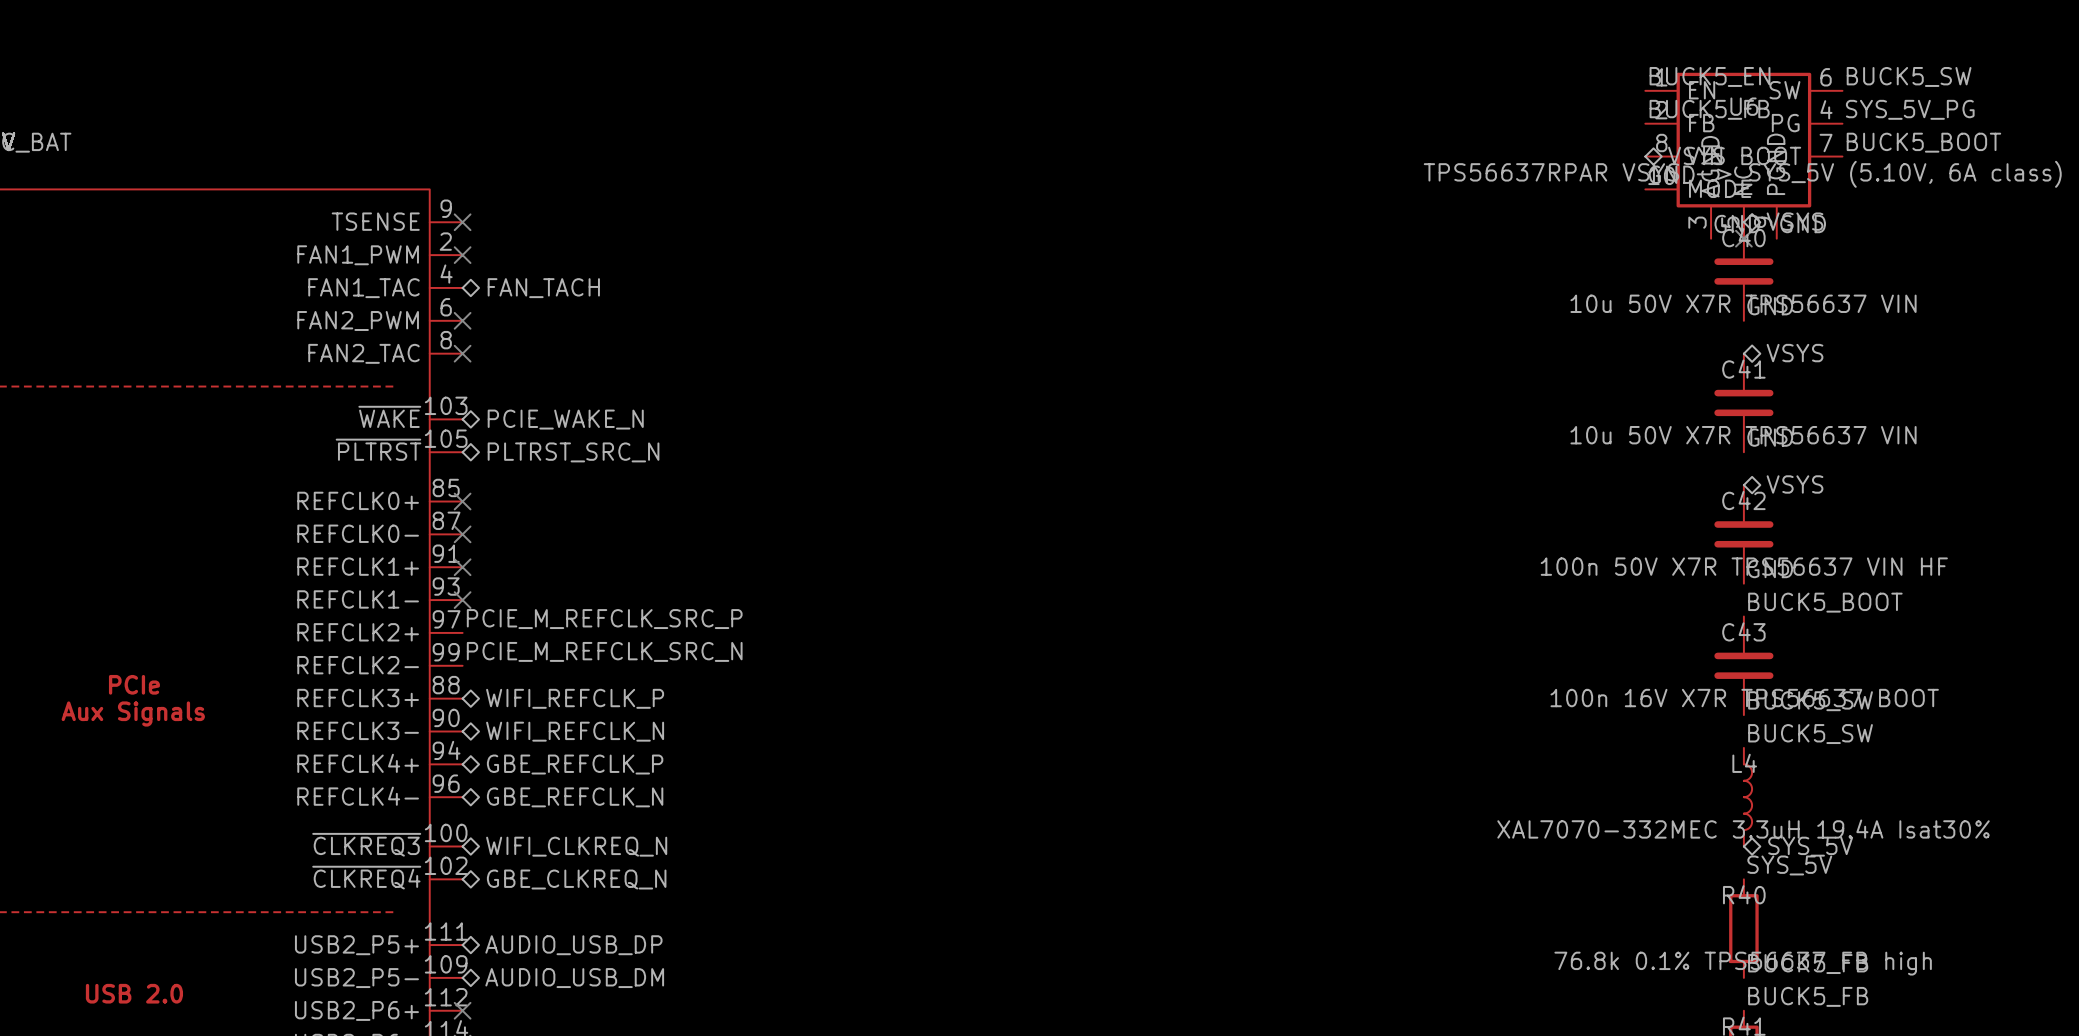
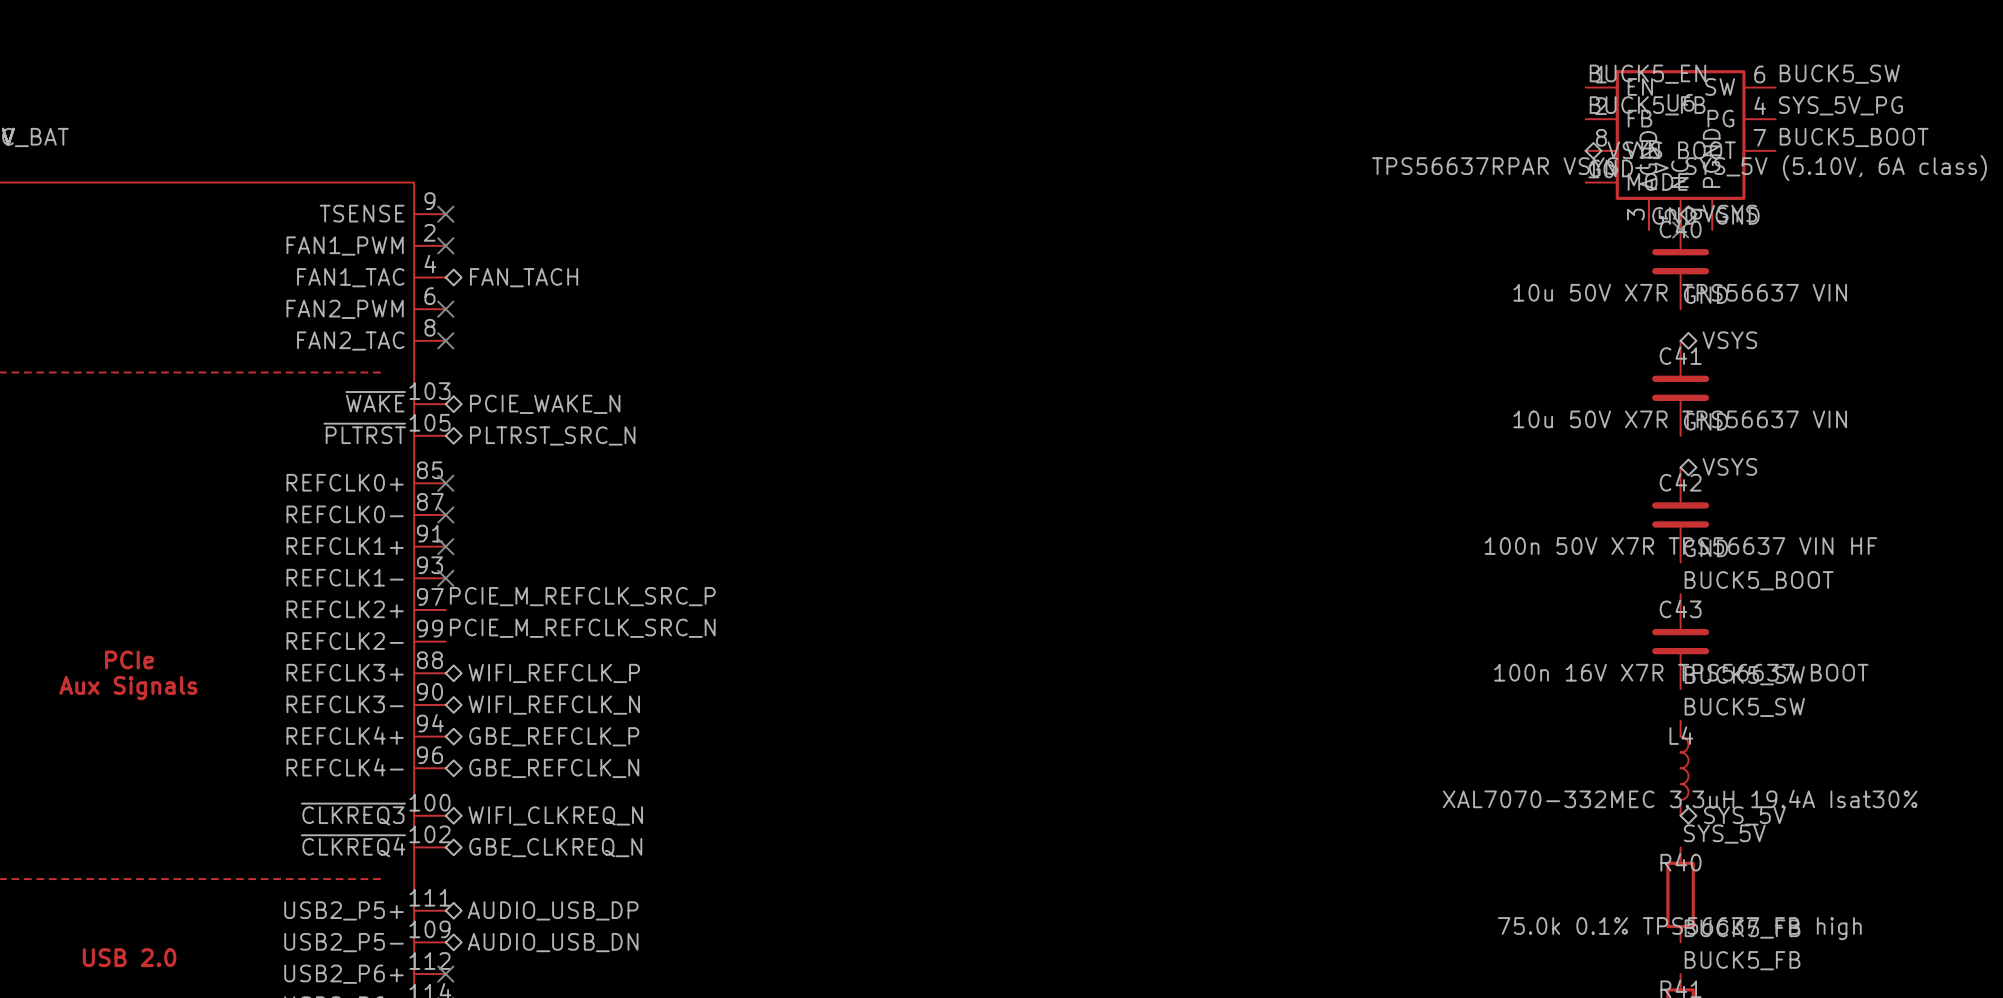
R40 value: 76.8k 0.1% TPS56637 FB high (1743, 963) -> 75.0k 0.1% TPS56637 FB high (1679, 928)
hierarchical label: AUDIO_USB_DM (574, 978) -> AUDIO_USB_DN (553, 942)

